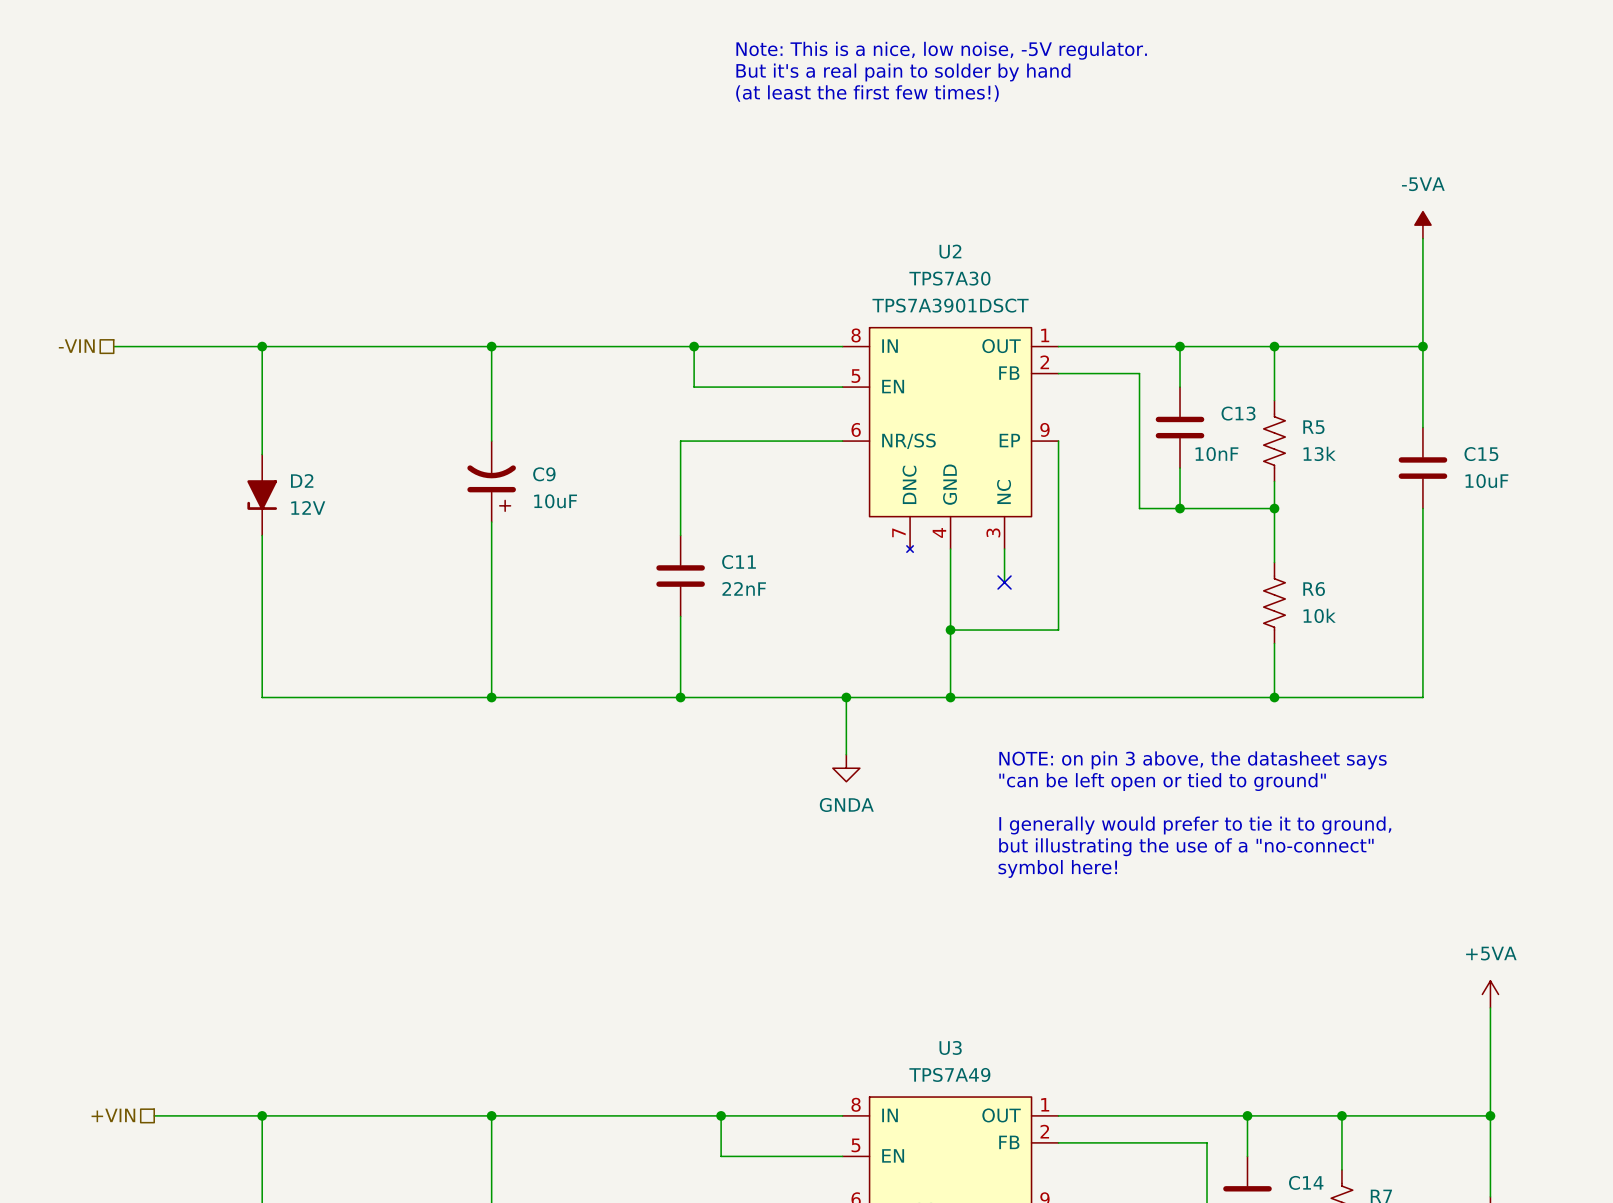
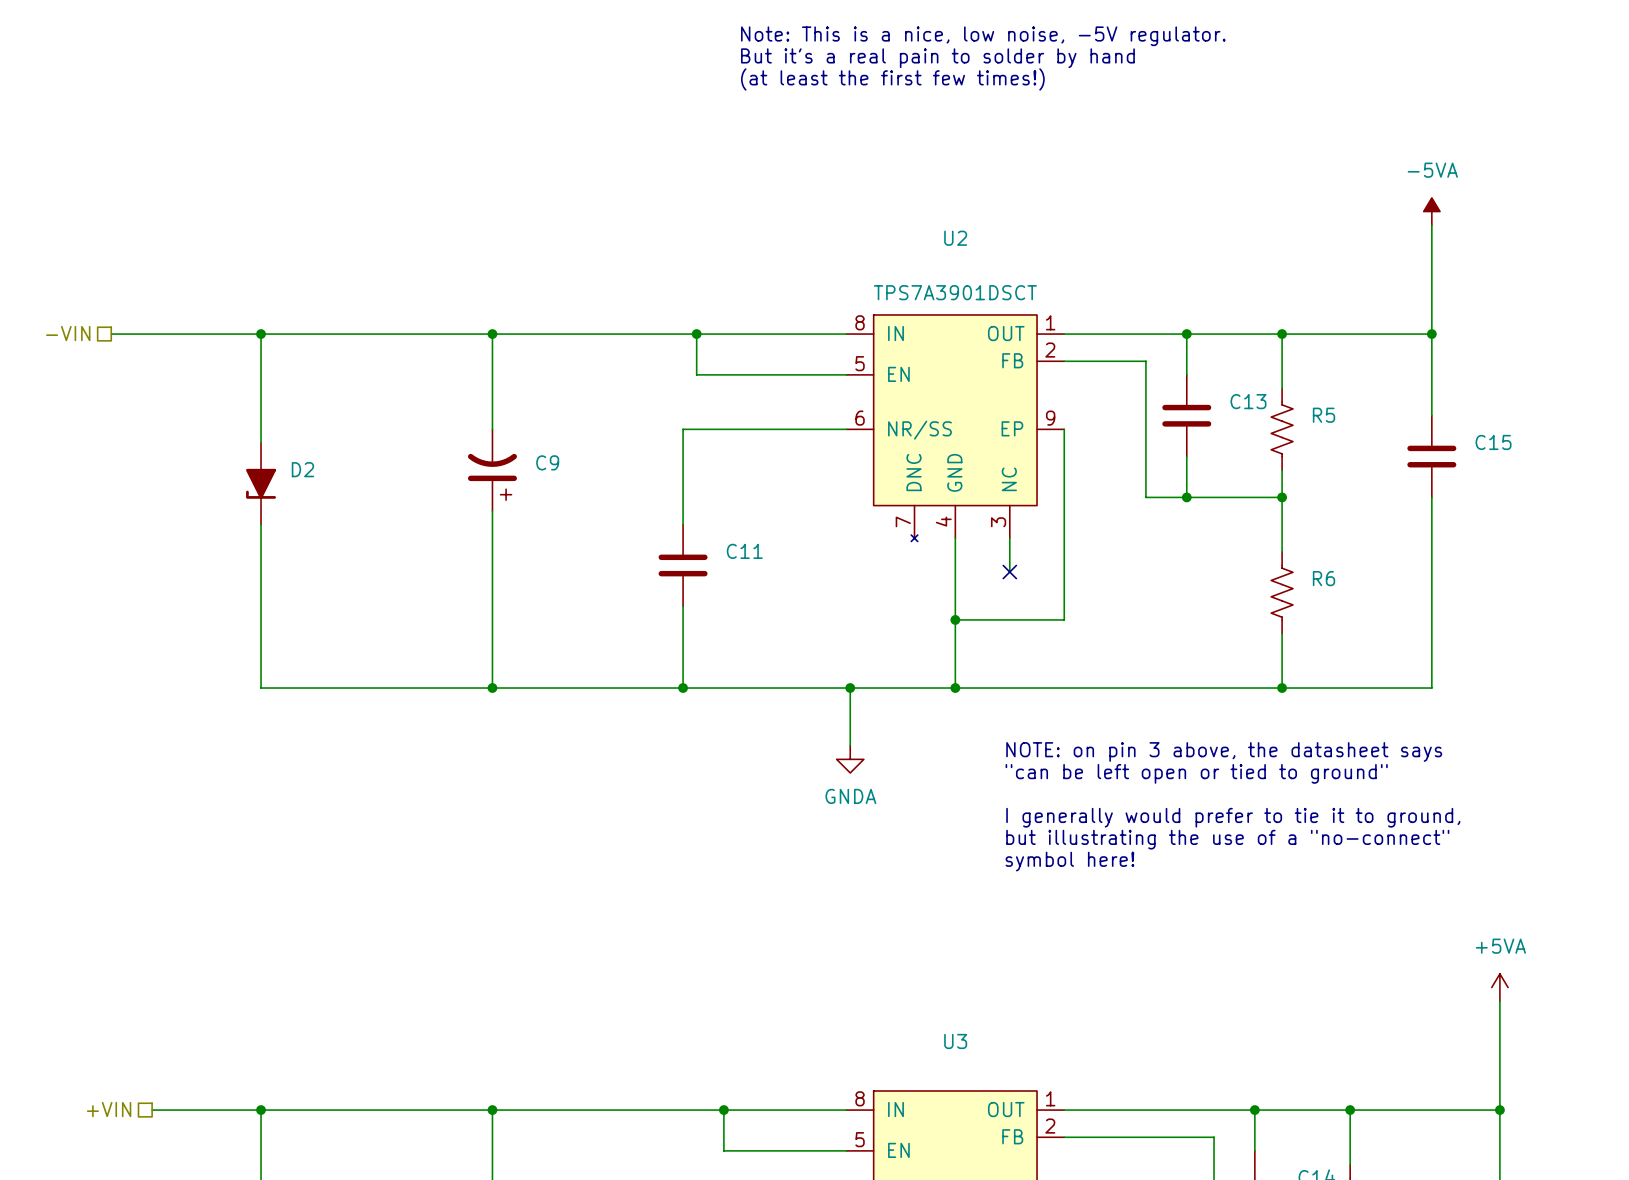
U2 value: TPS7A30 (949, 278) -> none
R5 value: 13k (1319, 453) -> none
C13 value: 10nF (1216, 454) -> none
C15 value: 10uF (1486, 481) -> none
C9 value: 10uF (555, 501) -> none
D2 value: 12V (308, 507) -> none
C11 value: 22nF (744, 588) -> none
R6 value: 10k (1319, 615) -> none
U3 value: TPS7A49 (949, 1074) -> none

